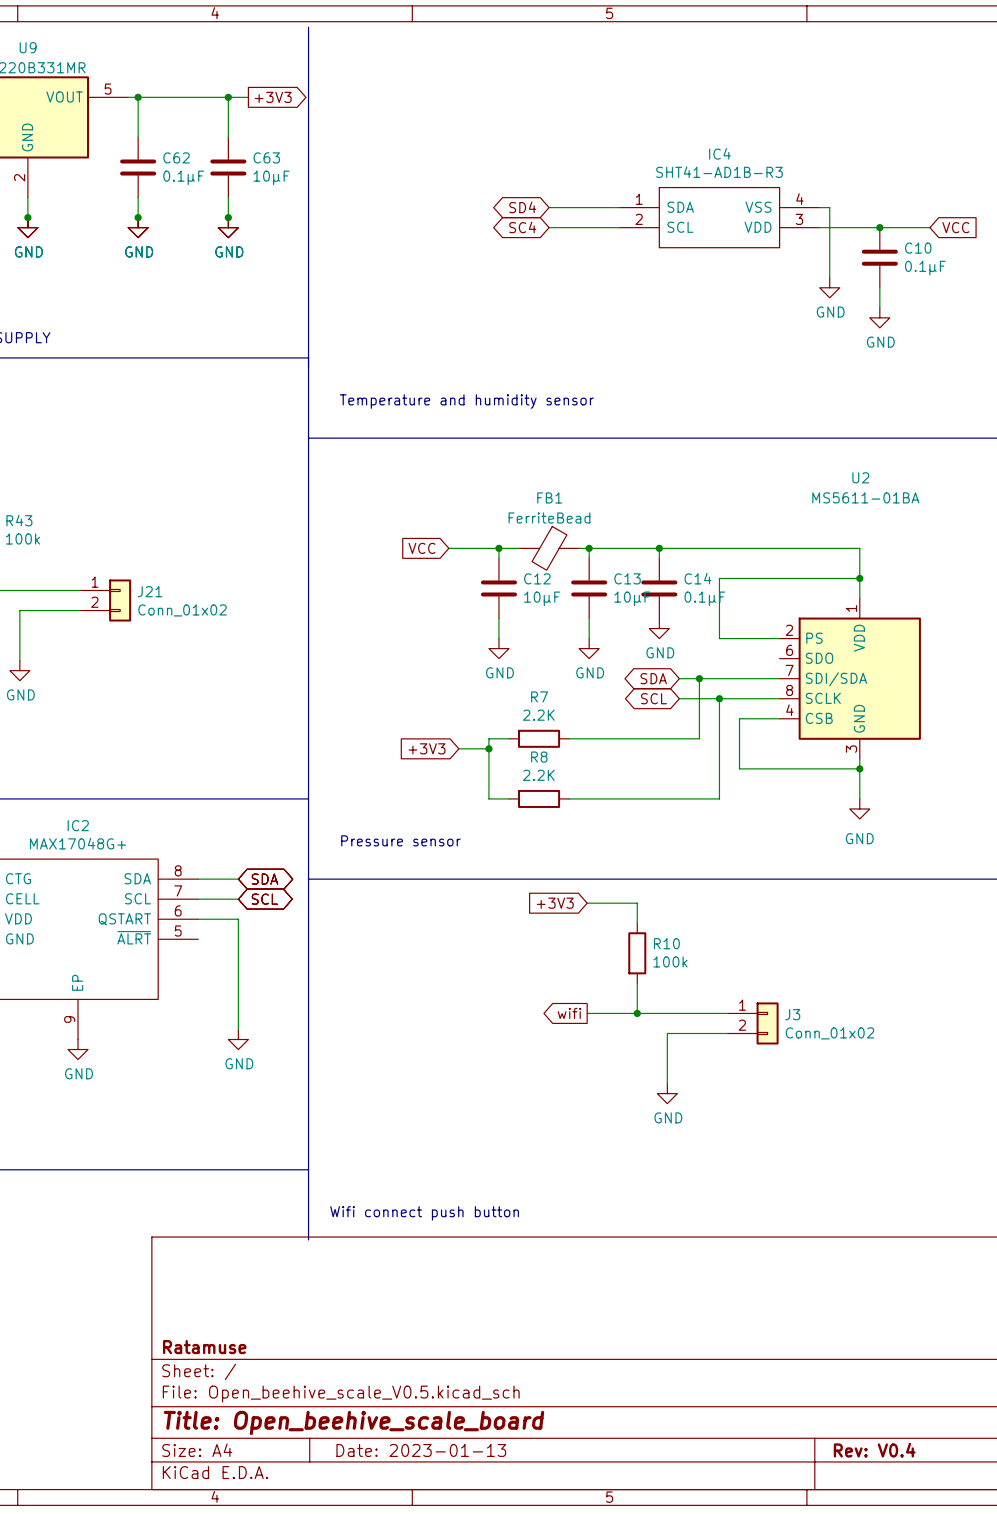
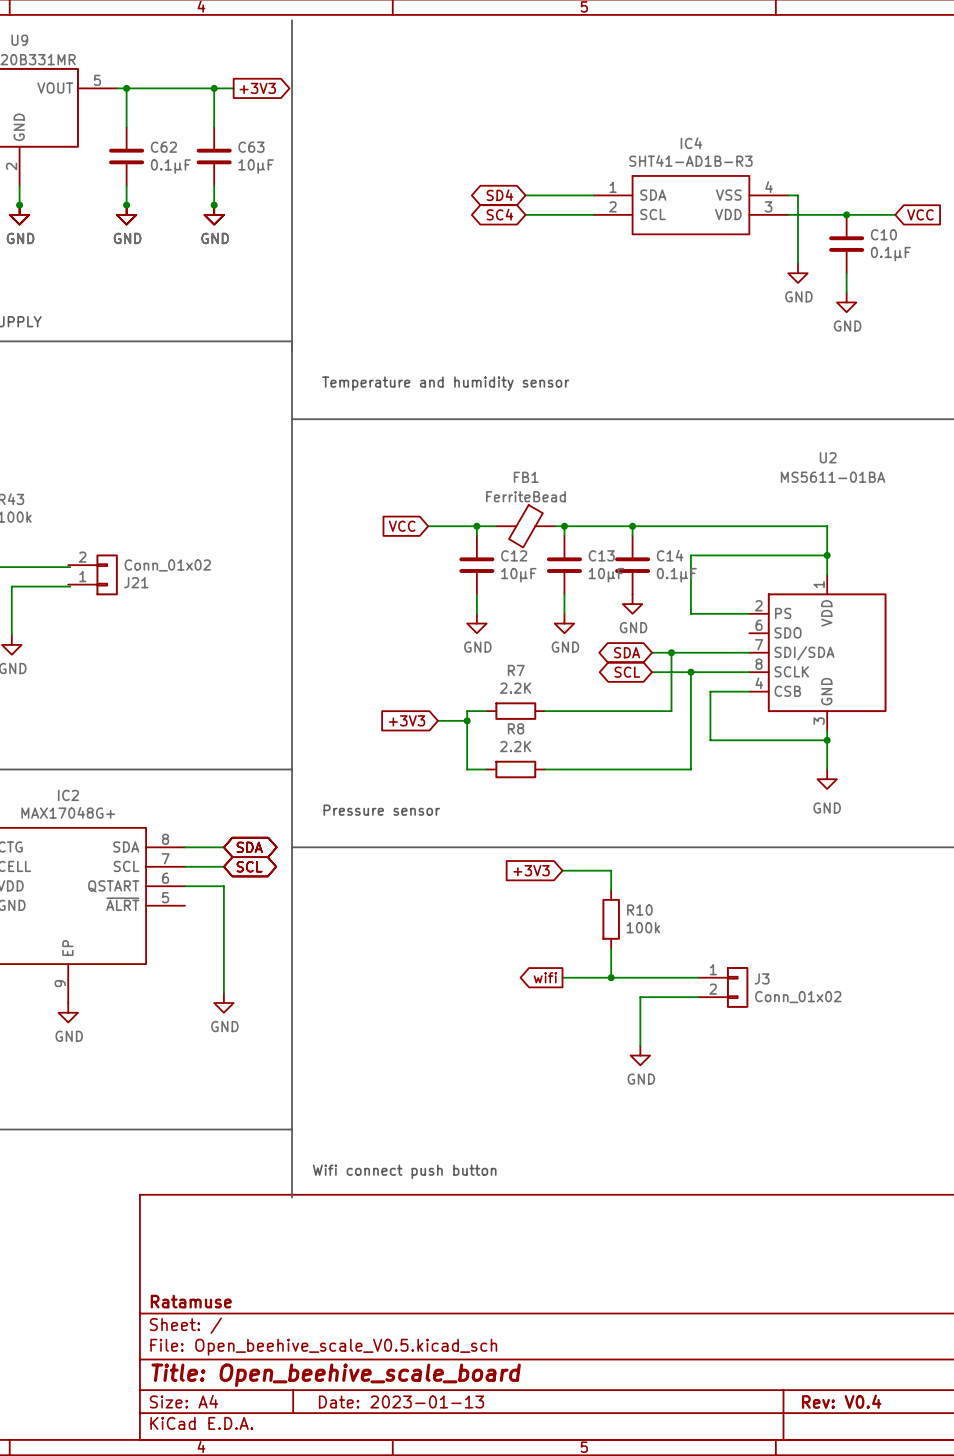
J21 flip: as is (120, 600) -> up-down (107, 574)

